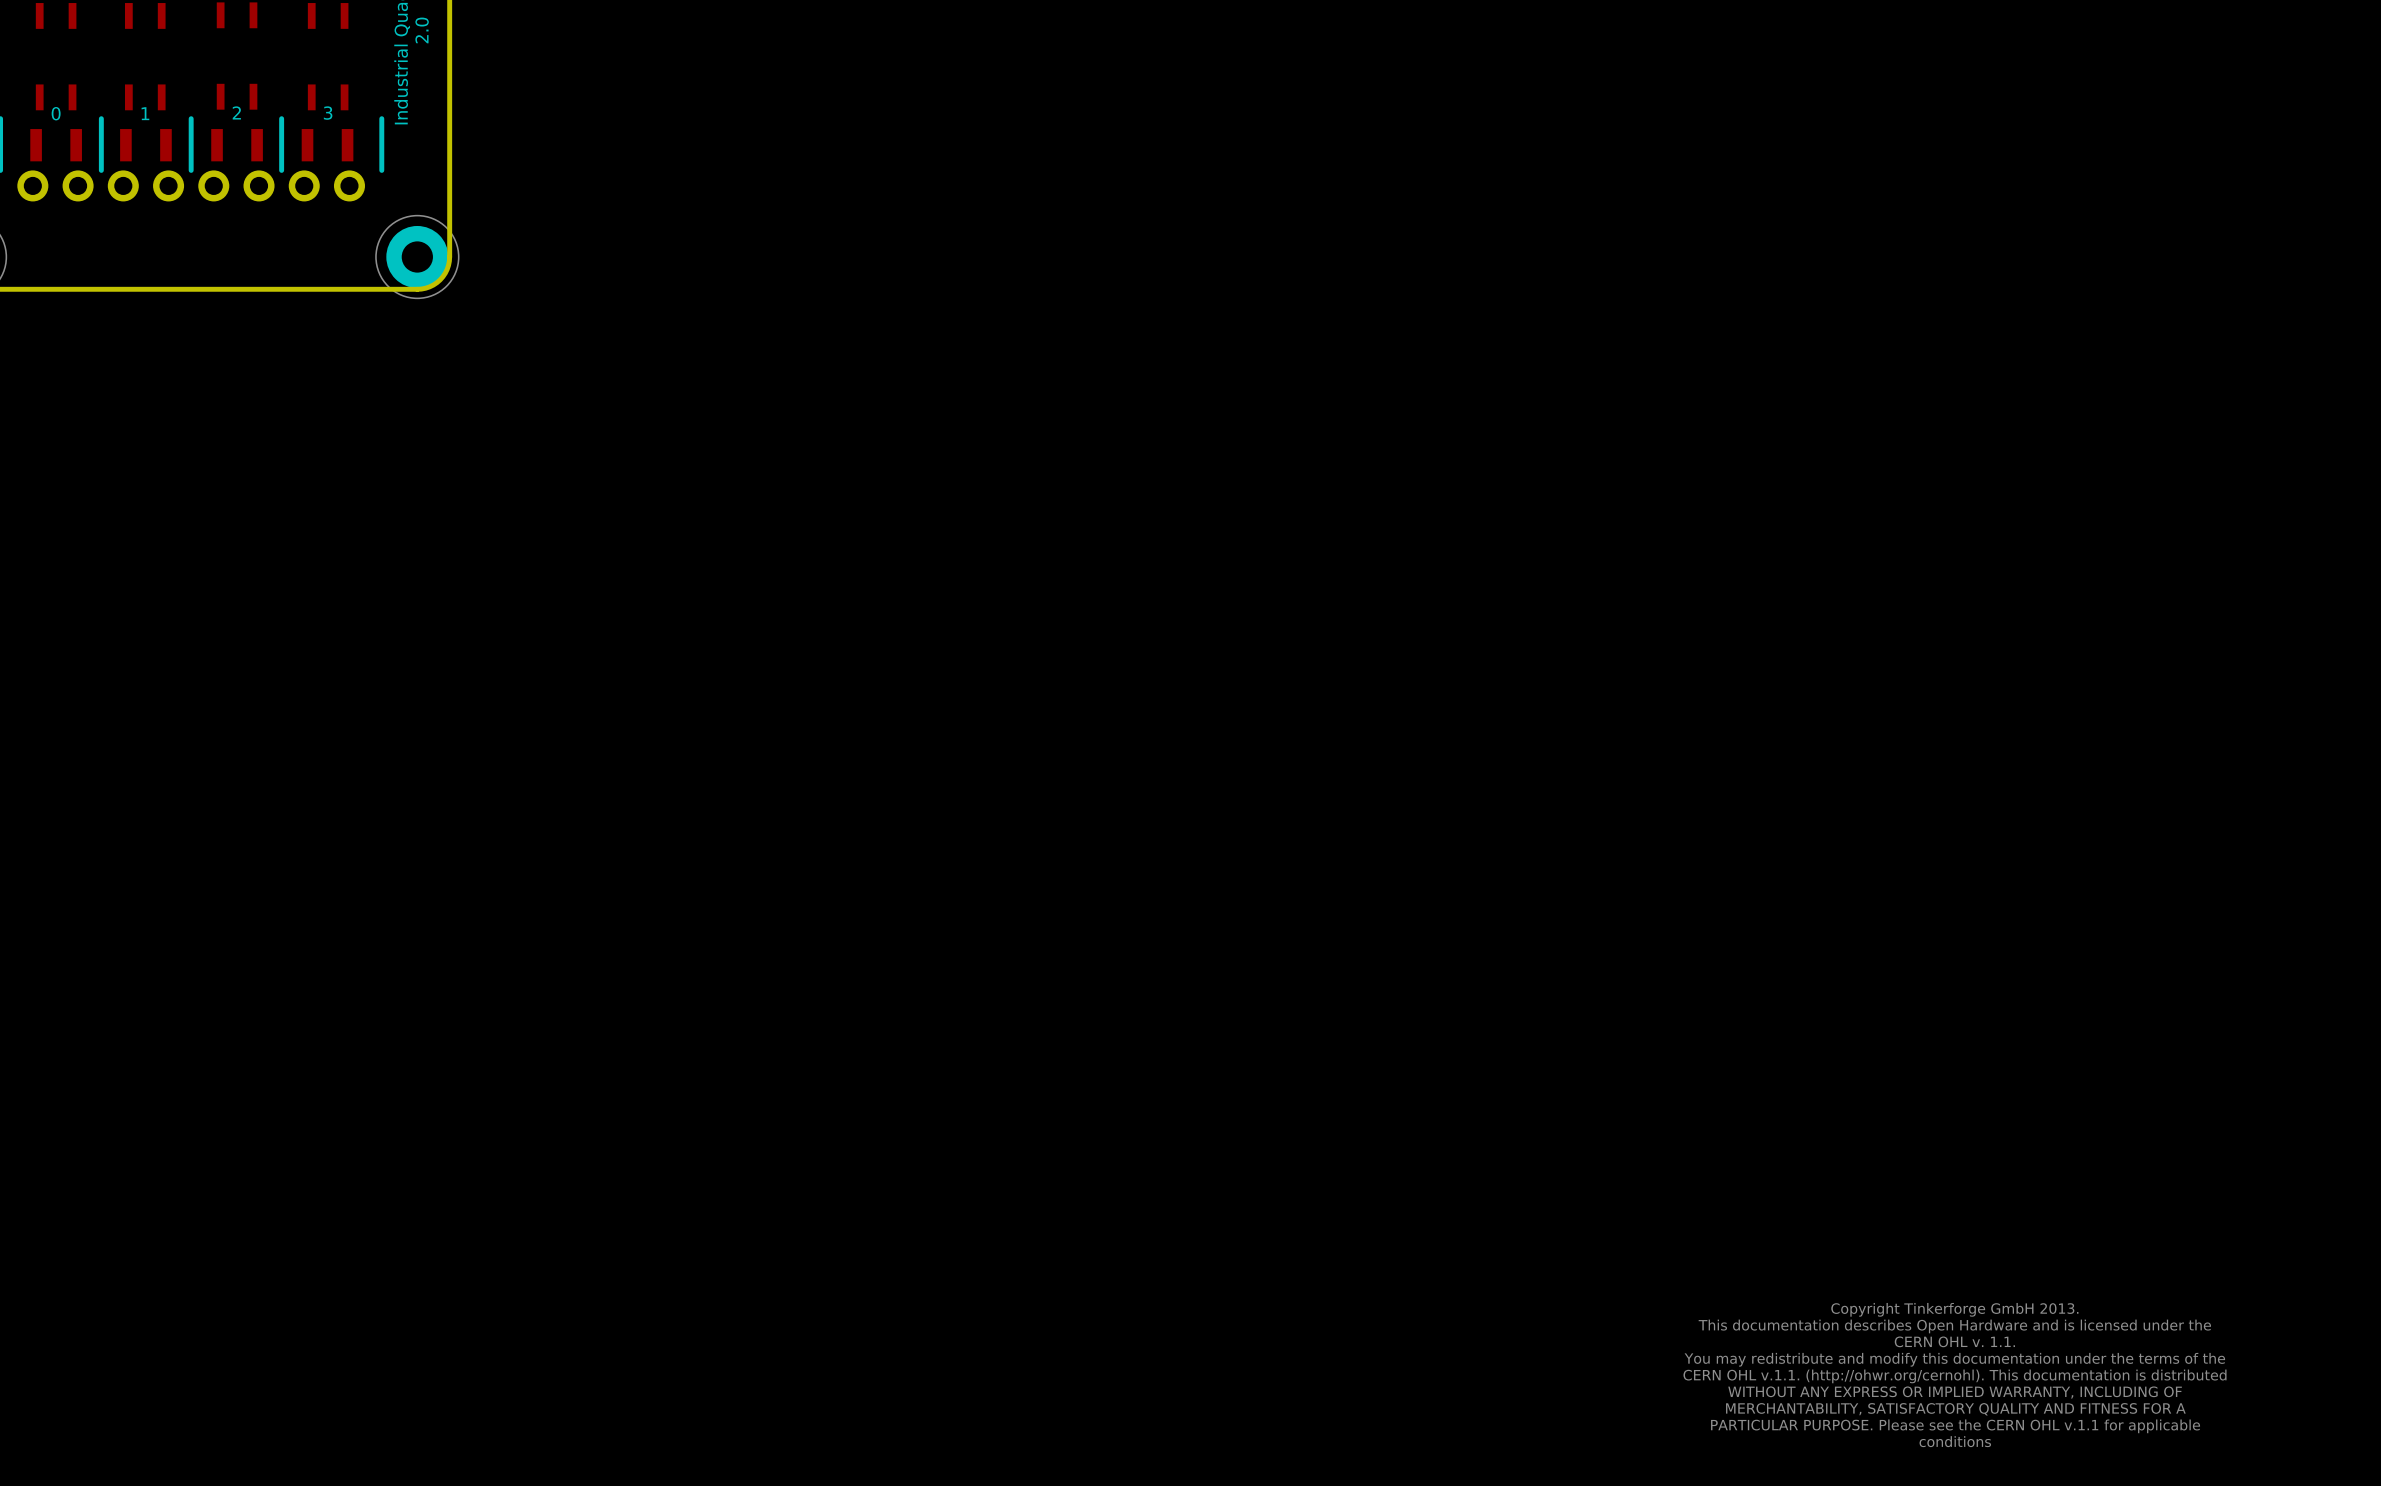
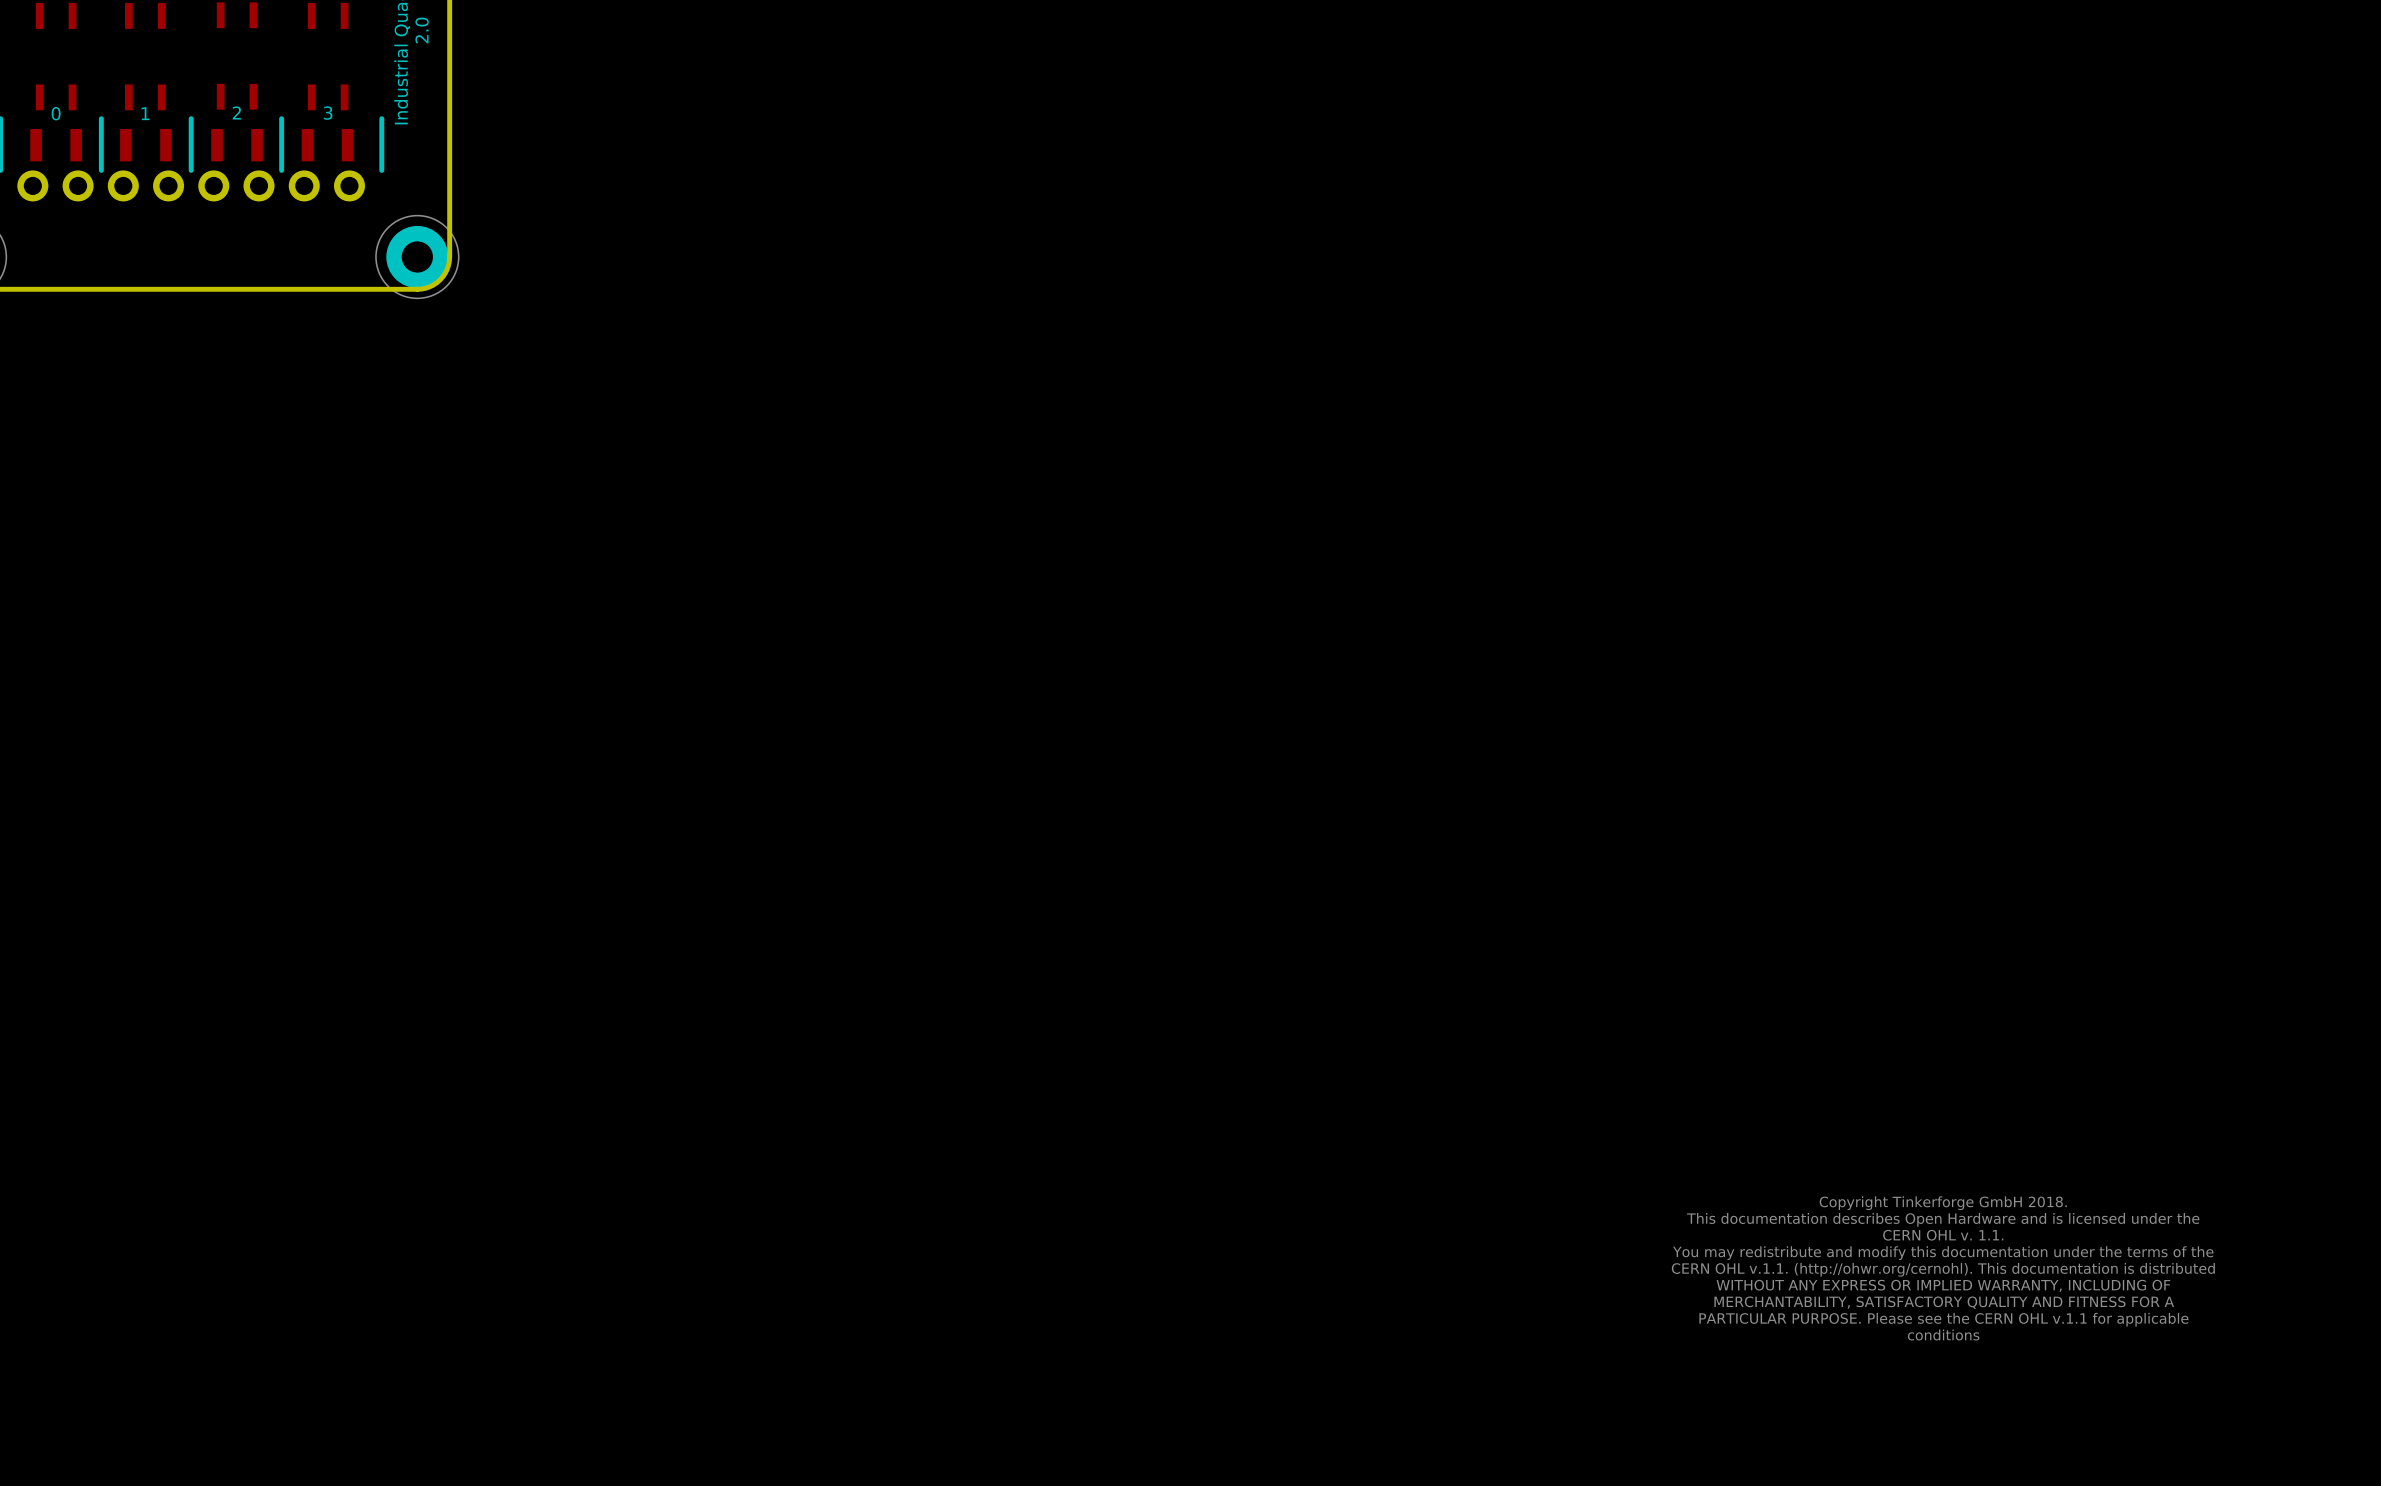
text: none -> Copyright Tinkerforge GmbH 2018. (1943, 1203)
text: Copyright Tinkerforge GmbH 2013. (1954, 1309) -> none
text position: This documentation describes Open Hardware and is licensed under the (1954, 1326) -> This documentation describes Open Hardware and is licensed under the (1943, 1219)
text position: CERN OHL v. 1.1. (1954, 1341) -> CERN OHL v. 1.1. (1943, 1235)
text position: You may redistribute and modify this documentation under the terms of the (1954, 1359) -> You may redistribute and modify this documentation under the terms of the (1943, 1253)
text position: CERN OHL v.1.1. (http://ohwr.org/cernohl). This documentation is distributed (1954, 1376) -> CERN OHL v.1.1. (http://ohwr.org/cernohl). This documentation is distributed (1943, 1269)
text position: WITHOUT ANY EXPRESS OR IMPLIED WARRANTY, INCLUDING OF (1955, 1392) -> WITHOUT ANY EXPRESS OR IMPLIED WARRANTY, INCLUDING OF (1943, 1285)
text position: MERCHANTABILITY, SATISFACTORY QUALITY AND FITNESS FOR A (1955, 1409) -> MERCHANTABILITY, SATISFACTORY QUALITY AND FITNESS FOR A (1944, 1302)
text position: PARTICULAR PURPOSE. Please see the CERN OHL v.1.1 for applicable (1955, 1426) -> PARTICULAR PURPOSE. Please see the CERN OHL v.1.1 for applicable (1943, 1319)
text position: conditions (1955, 1441) -> conditions (1943, 1335)

